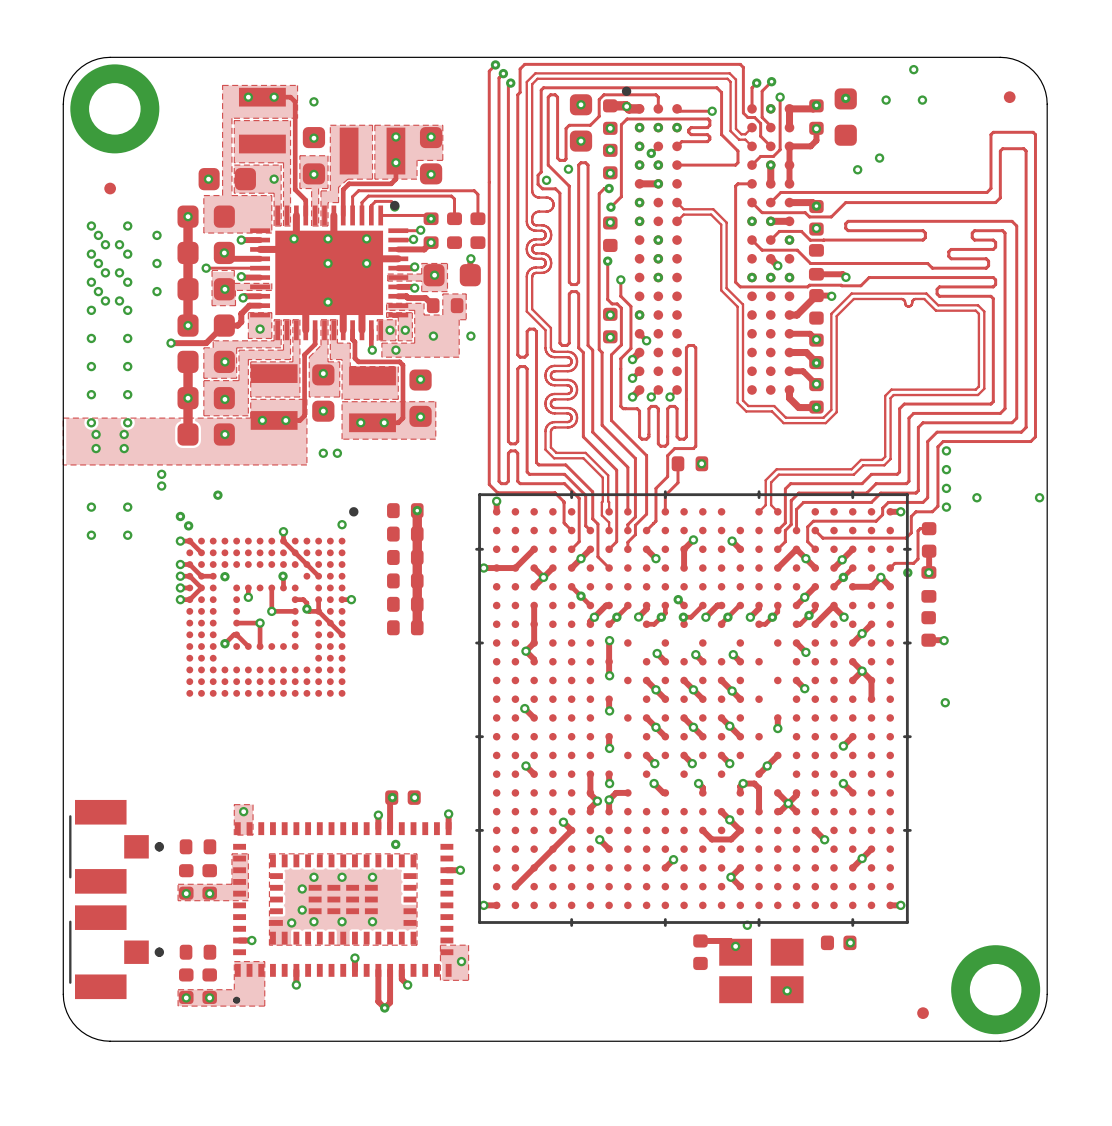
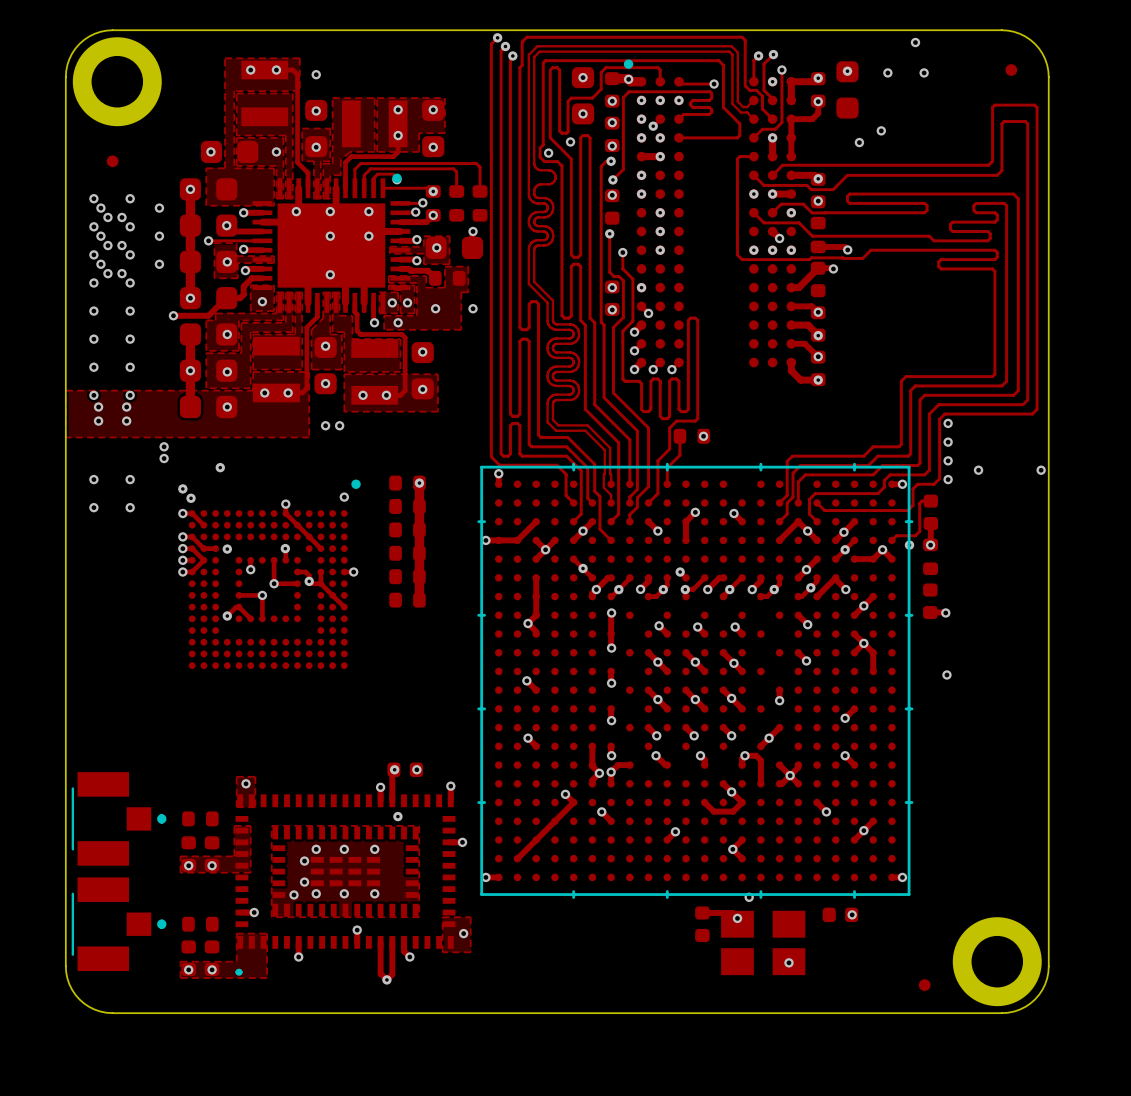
track: (677, 202) (683, 209) (713, 209) (726, 222) (726, 288) (743, 304) (743, 400) (748, 406) (774, 406) (785, 417) (823, 417) (831, 409) (831, 313) (851, 293) (926, 293) (938, 305) (978, 305) (984, 311) (984, 388) (978, 395) (893, 395) (890, 398) (890, 459) (884, 465) (863, 465) (853, 474) (778, 474) (771, 482) (771, 505) (777, 511) -> none
track: (677, 221) (683, 214) (711, 214) (721, 224) (721, 290) (737, 306) (737, 402) (746, 411) (771, 411) (783, 423) (825, 423) (836, 412) (836, 316) (853, 298) (902, 299) (908, 306) (914, 299) (924, 298) (935, 310) (975, 310) (978, 313) (978, 386) (975, 389) (891, 389) (885, 395) (885, 456) (882, 459) (861, 459) (851, 469) (776, 469) (765, 480) (765, 505) (759, 511) -> none

